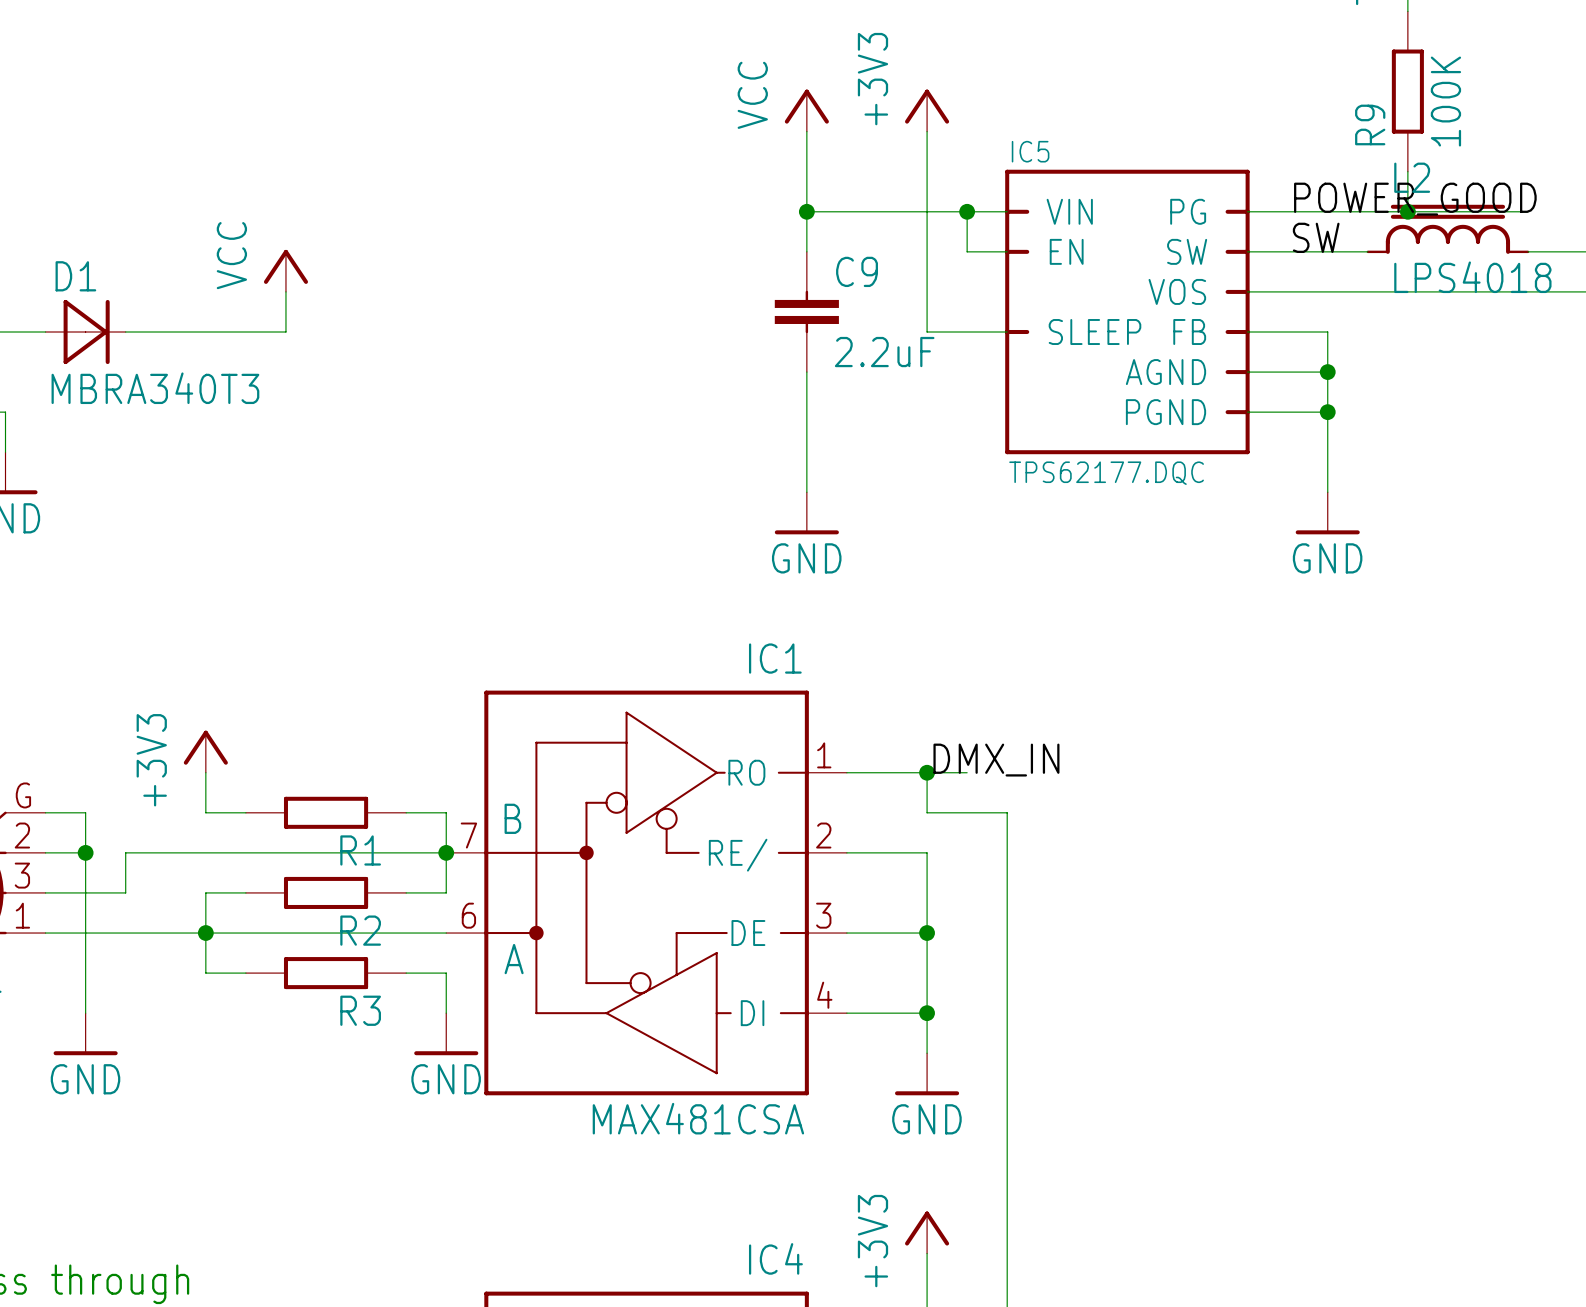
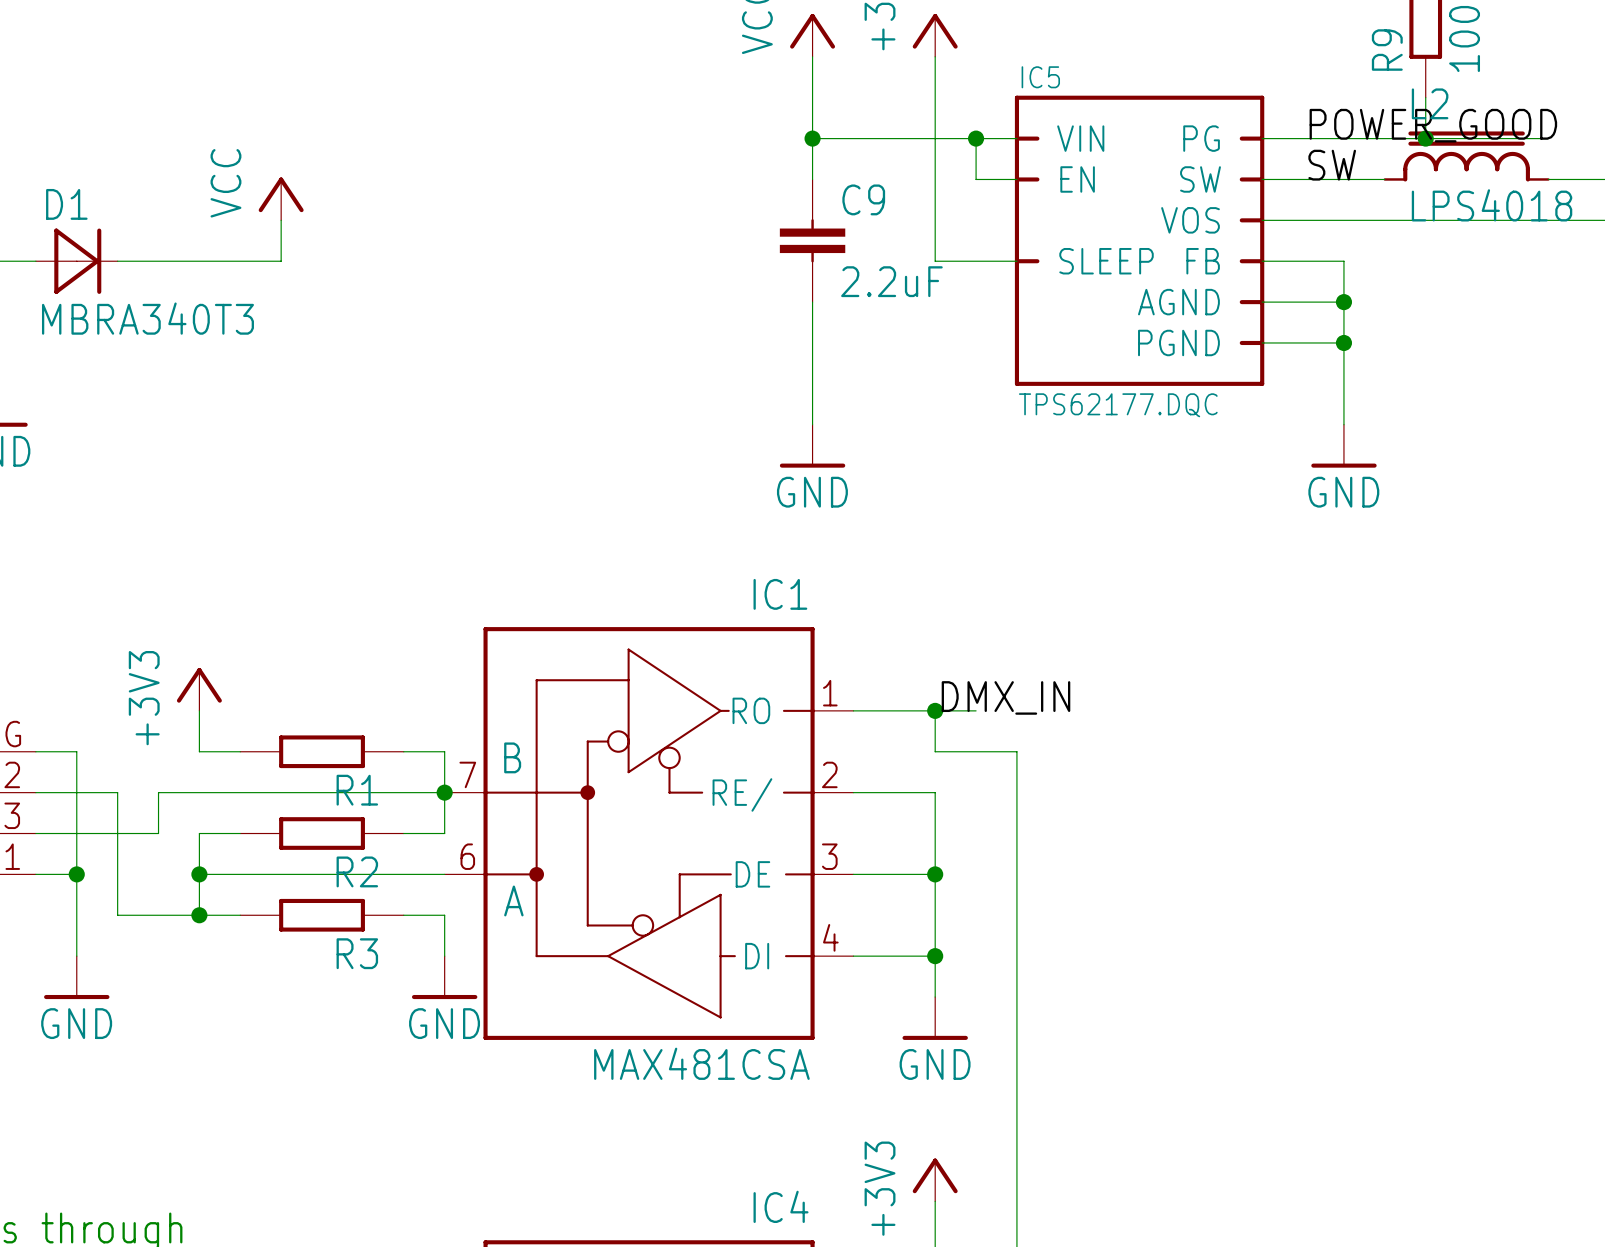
junction position: (85, 852) -> (76, 874)
wire: (125, 852) (165, 852) -> (117, 792) (76, 792)
wire: none -> (158, 792) (158, 833) (117, 833) (117, 915) (199, 915)
wire: (85, 933) (205, 933) -> none
junction: none -> (199, 915)

